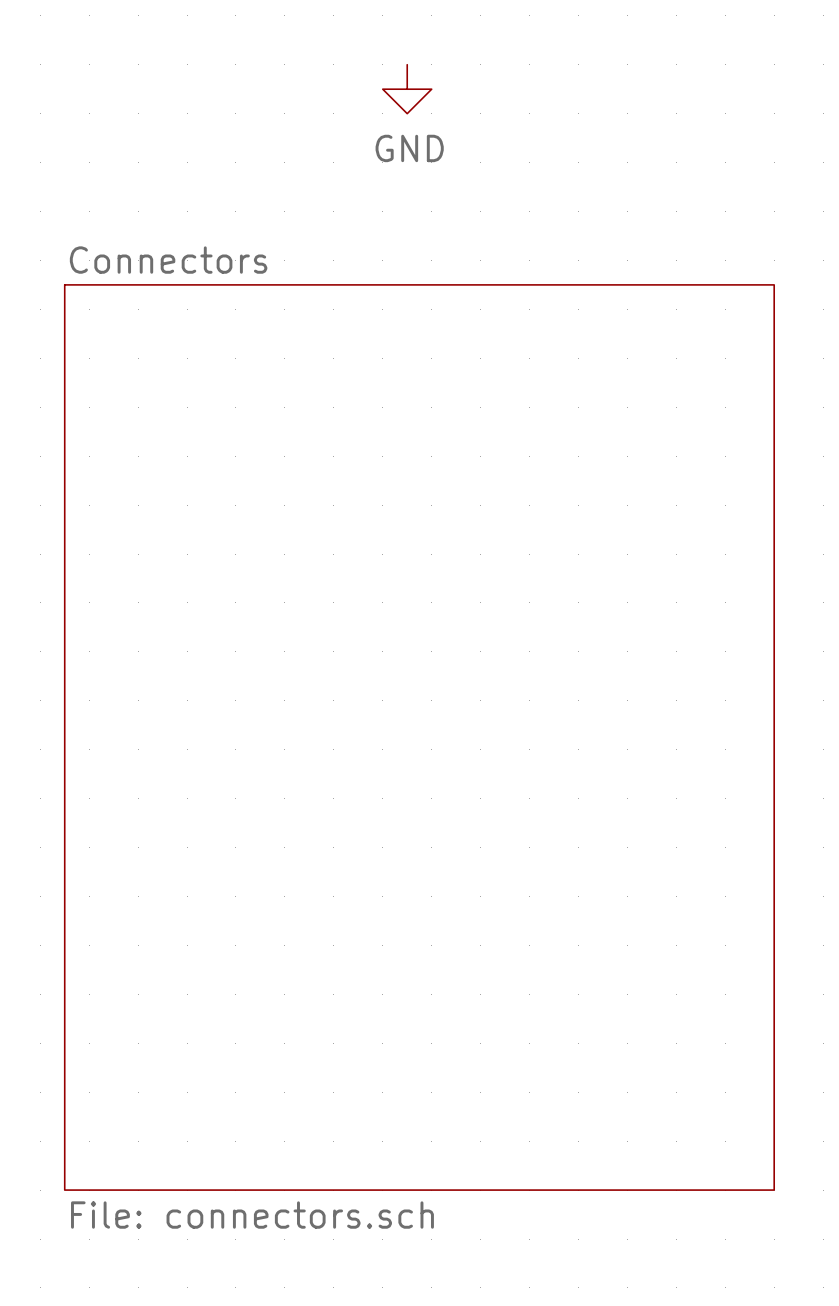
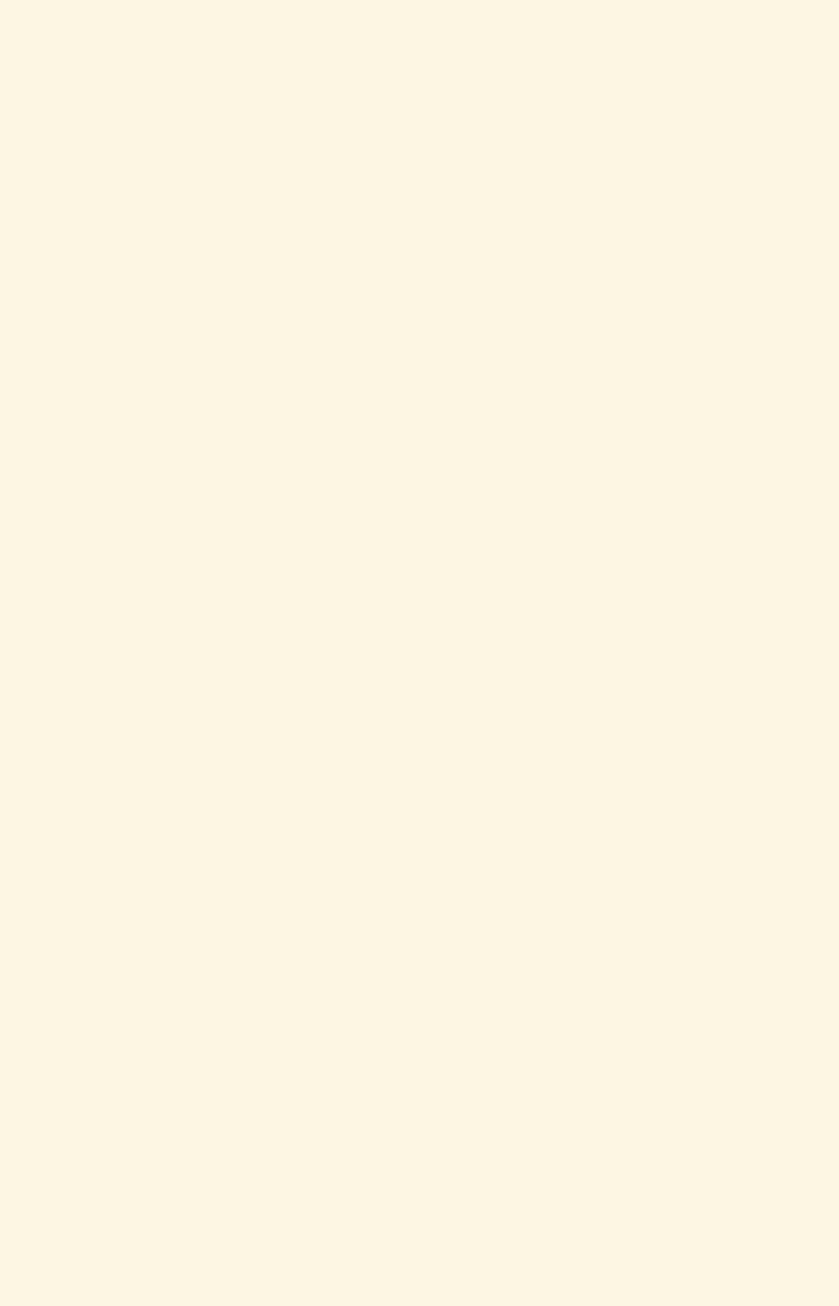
power symbol: GND (407, 89) -> none
sheet Connectors: File: connectors.sch (419, 737) -> none

